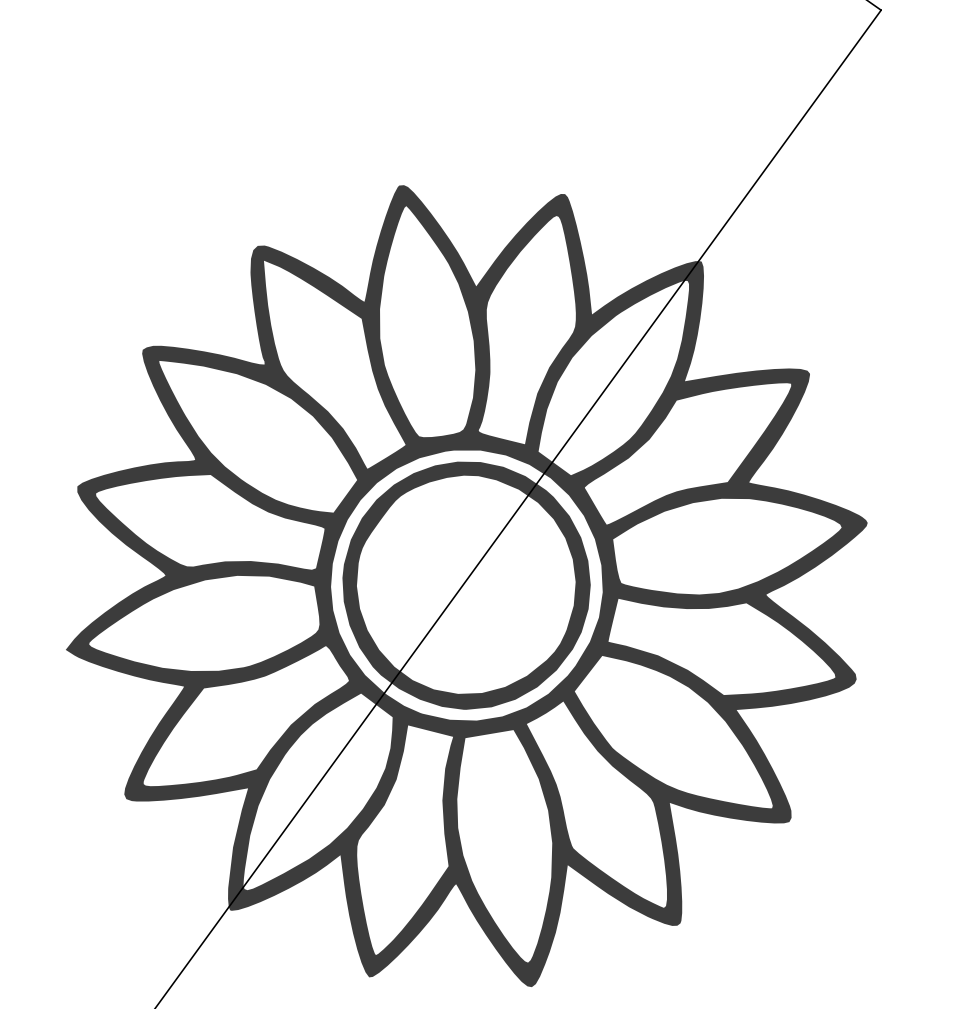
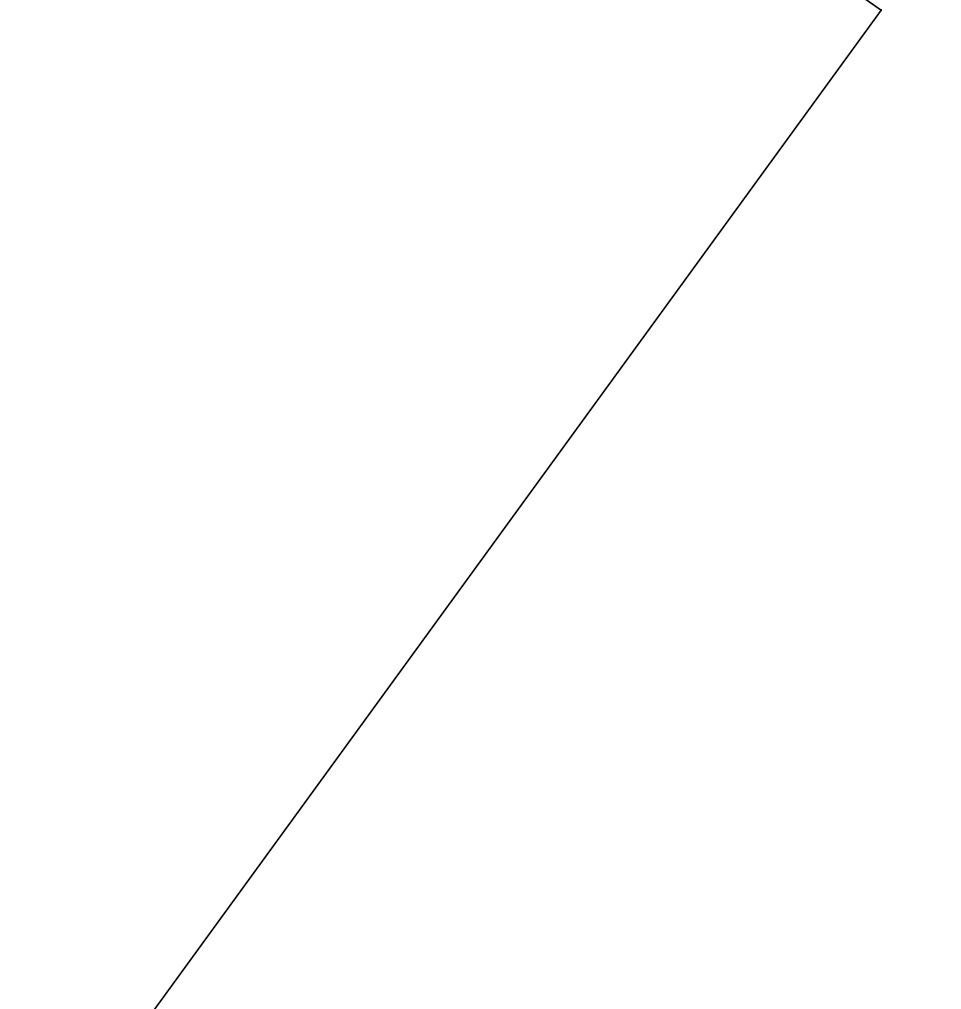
drawing: [65, 185, 868, 988] -> none

